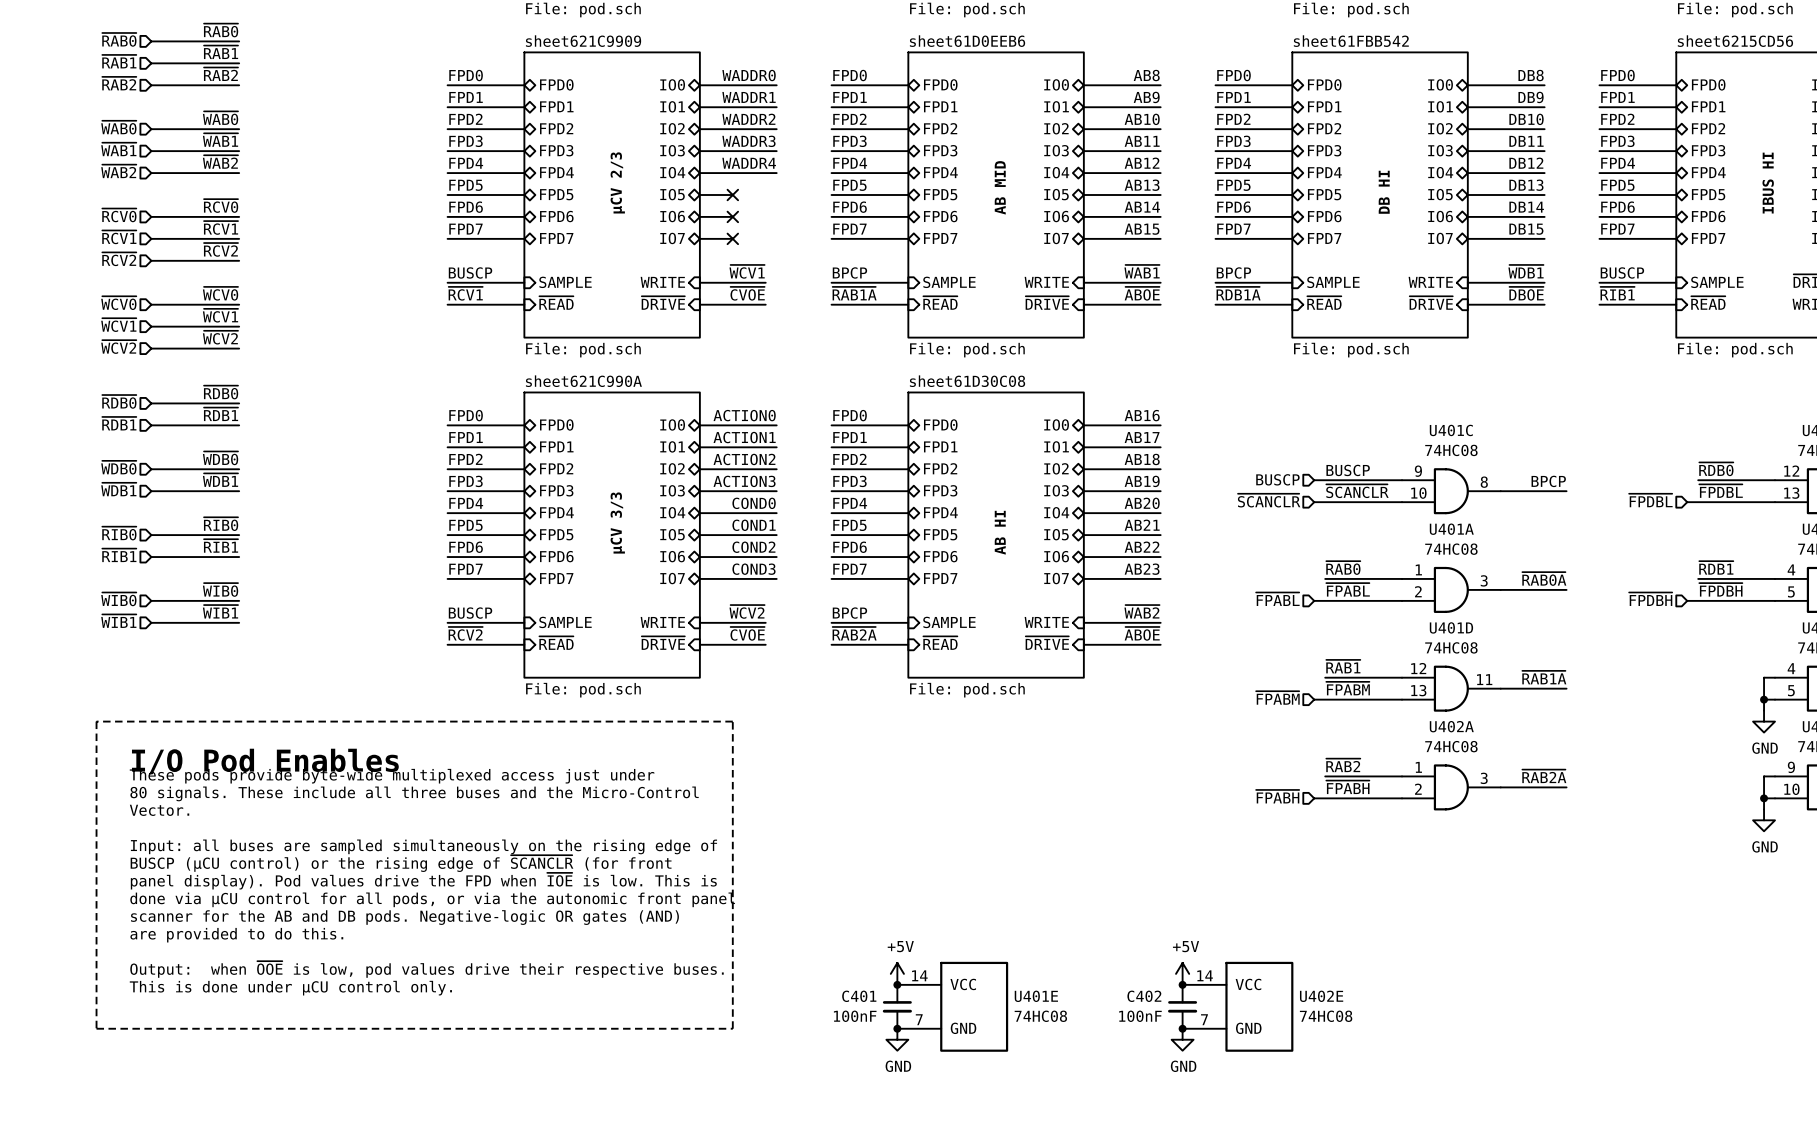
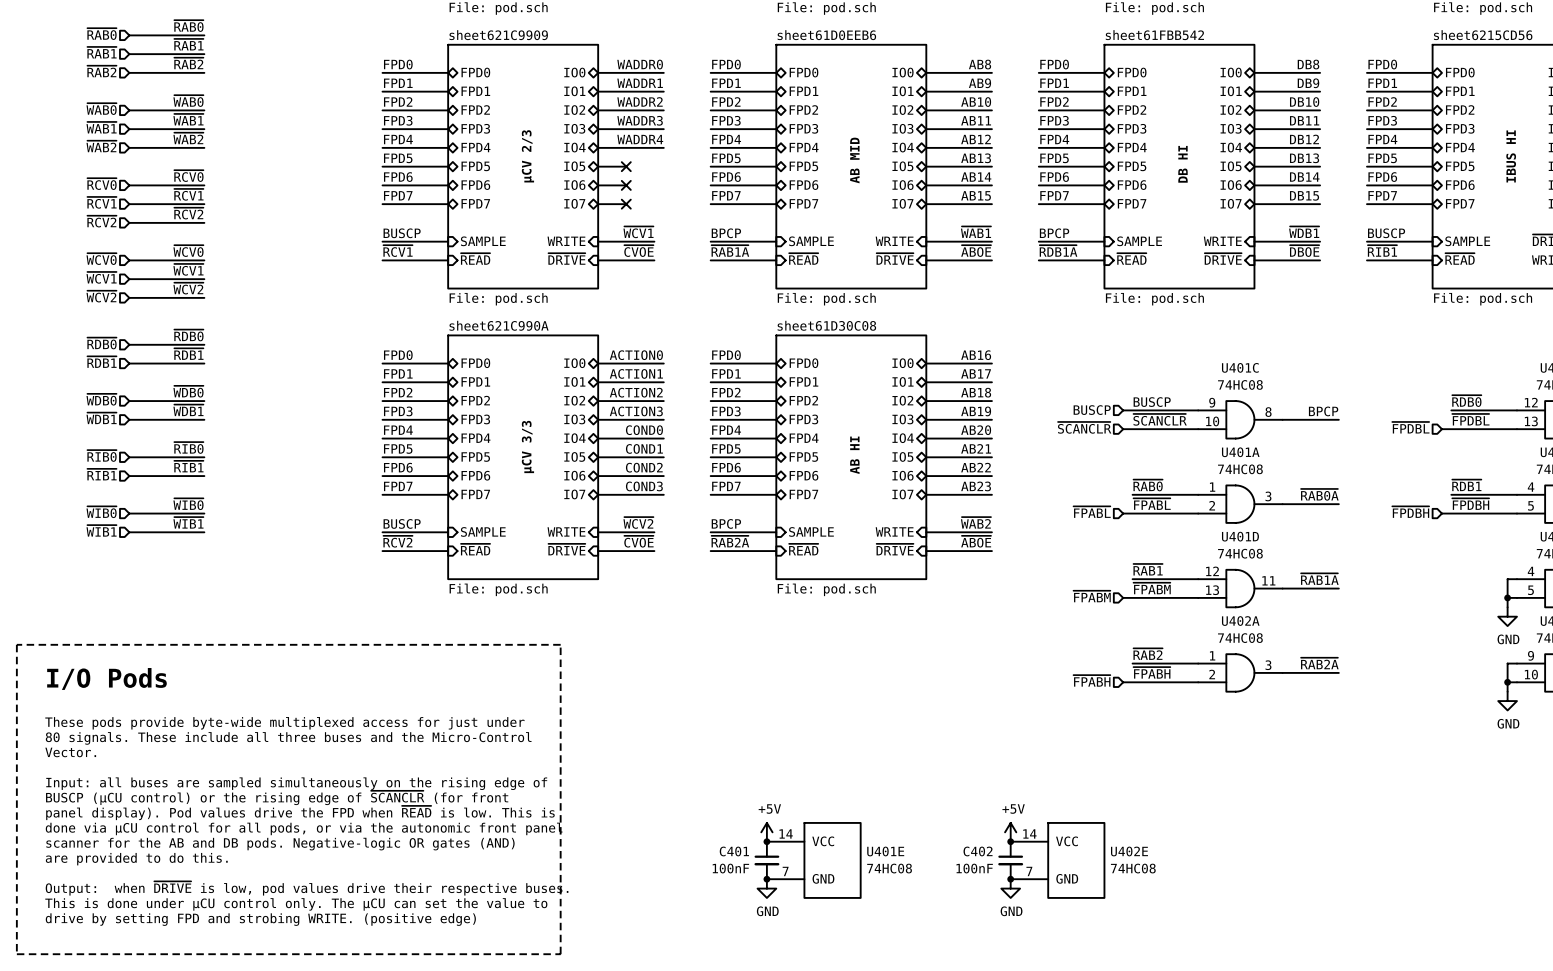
line: (96, 721) (732, 721) (732, 1028) (96, 1028) (96, 721) -> (16, 644) (16, 954) (560, 954) (560, 644) (16, 644)
text: I/O Pod Enables (265, 761) -> I/O Pods (106, 678)
text: These pods provide byte-wide multiplexed access just under (392, 776) -> none
text position: 80 signals. These include all three buses and the Micro-Control (414, 793) -> 80 signals. These include all three buses and the Micro-Control (288, 738)
text position: Vector. (159, 810) -> Vector. (70, 752)
text: none -> These pods provide byte-wide multiplexed access for just under (284, 723)
text position: Input: all buses are sampled simultaneously on the rising edge of (423, 846) -> Input: all buses are sampled simultaneously on the rising edge of (296, 783)
text position: BUSCP (µCU control) or the rising edge of ~{SCANCLR} (for front (401, 863) -> BUSCP (µCU control) or the rising edge of ~{SCANCLR} (for front (277, 797)
text: panel display). Pod values drive the FPD when ~{IOE} is low. This is (423, 881) -> none
text position: done via µCU control for all pods, or via the autonomic front panel (432, 899) -> done via µCU control for all pods, or via the autonomic front panel (304, 828)
text position: scanner for the AB and DB pods. Negative-logic OR gates (AND) (404, 917) -> scanner for the AB and DB pods. Negative-logic OR gates (AND) (280, 844)
text position: are provided to do this. (236, 935) -> are provided to do this. (136, 859)
text: none -> panel display). Pod values drive the FPD when ~{READ} is low. This is (300, 813)
text: Output: when ~{OOE} is low, pod values drive their respective buses. (427, 969) -> none
text: This is done under µCU control only. (290, 988) -> none
text: none -> Output: when ~{DRIVE} is low, pod values drive their respective buses. (307, 888)
text: none -> This is done under µCU control only. The µCU can set the value to (296, 904)
text: none -> drive by setting FPD and strobing WRITE. (positive edge) (260, 919)

